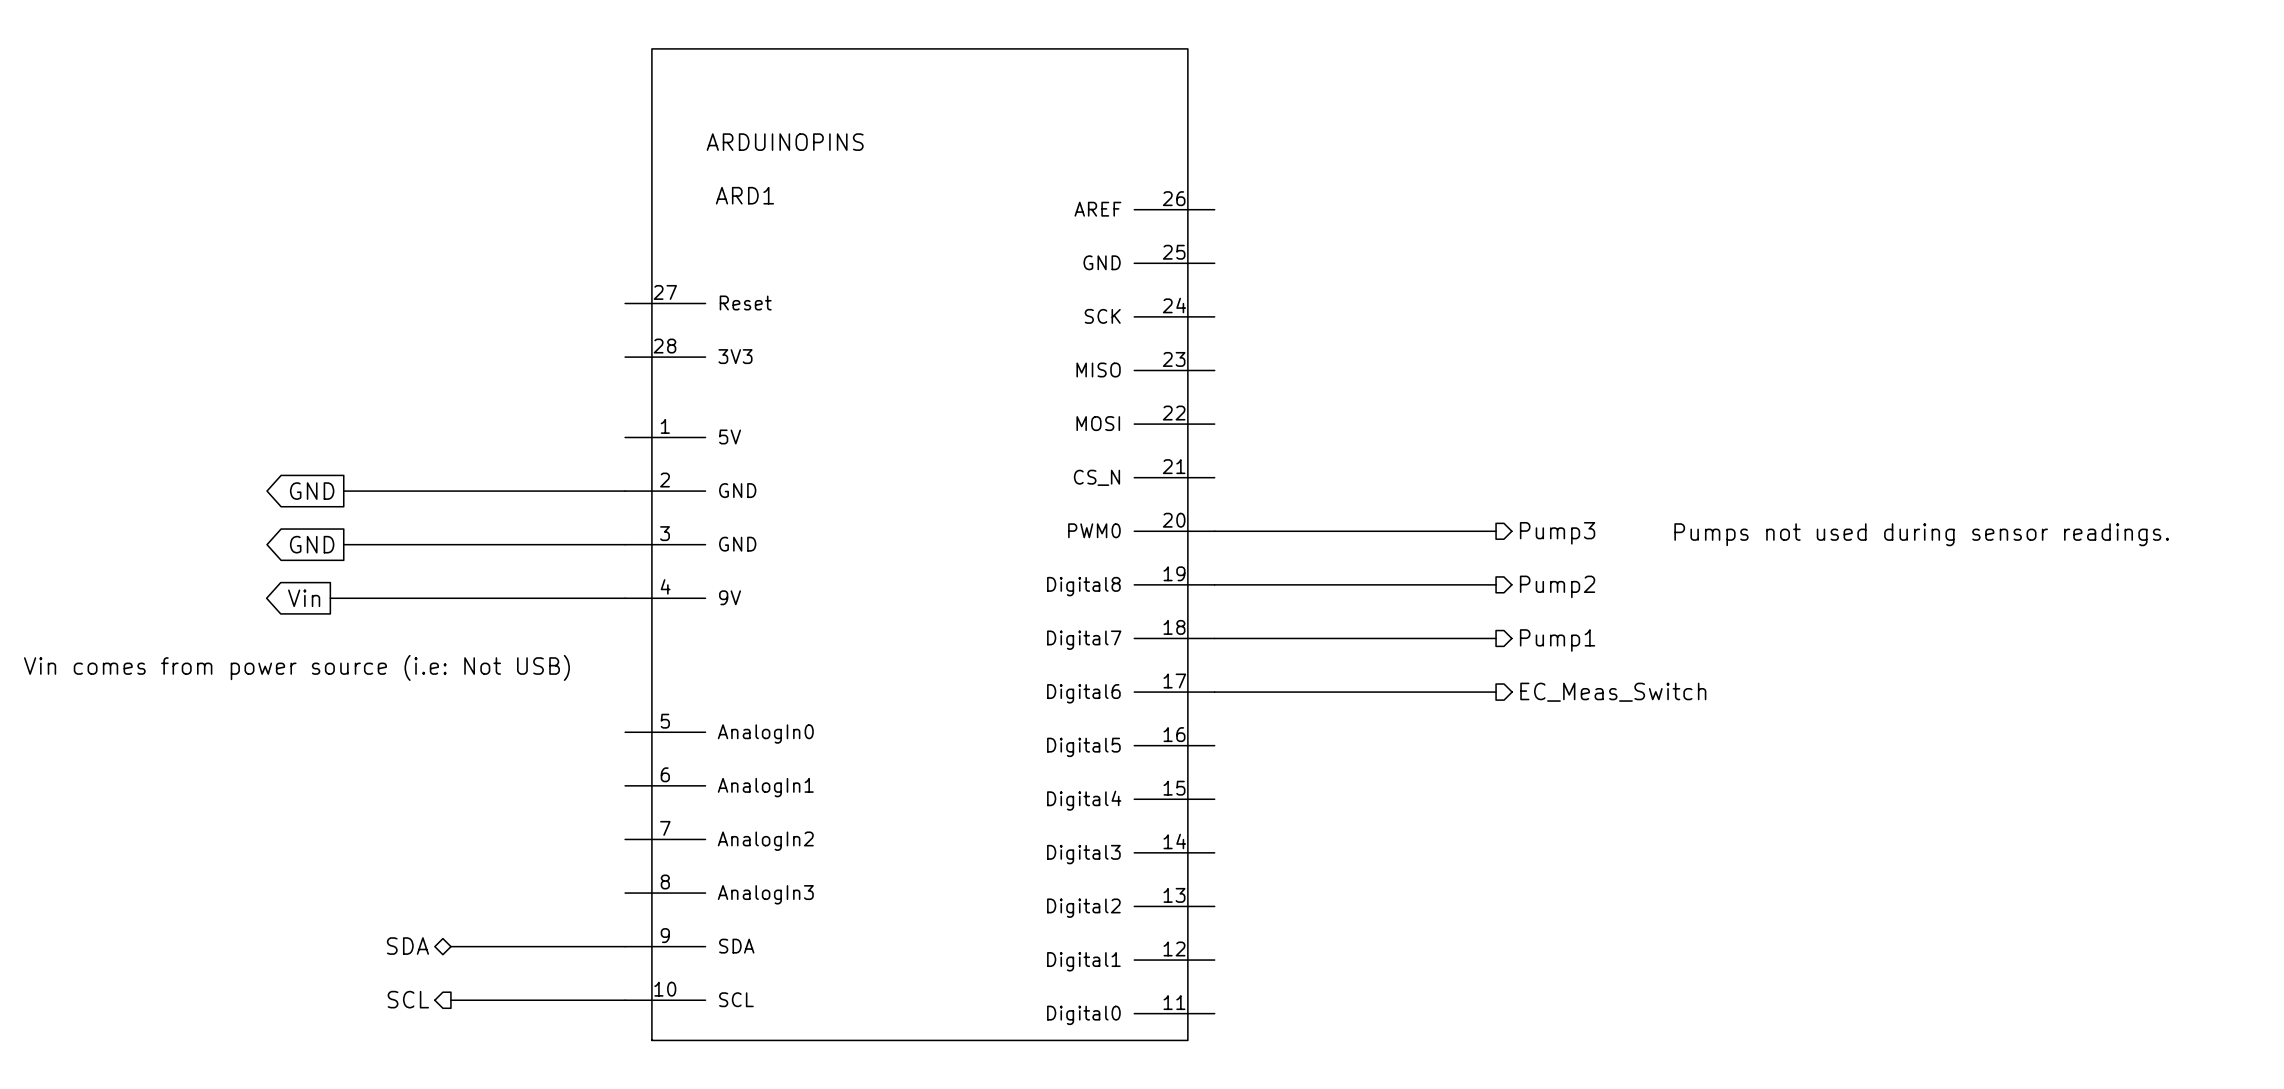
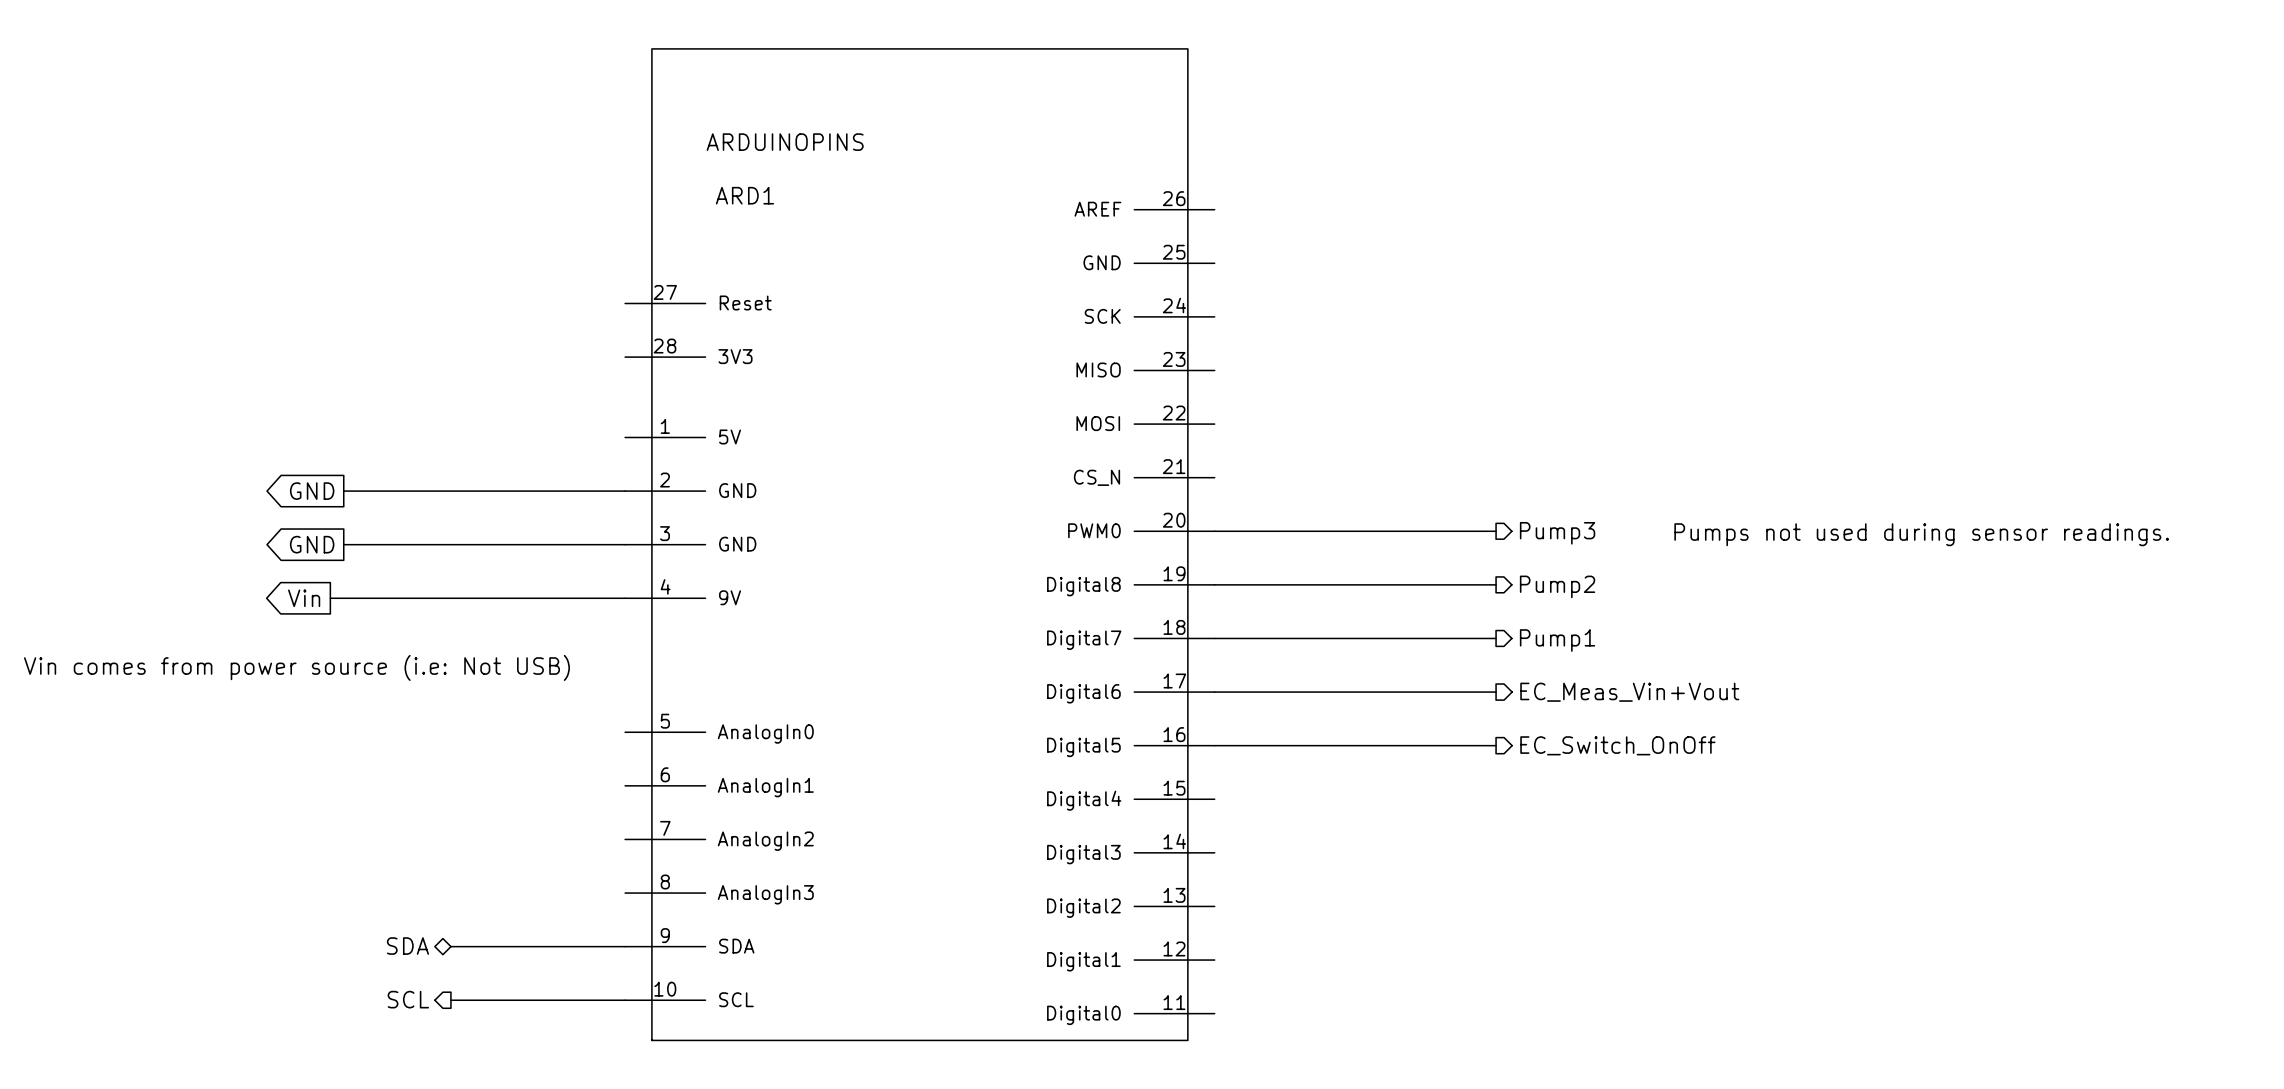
hierarchical label: EC_Meas_Switch (1613, 692) -> EC_Meas_Vin+Vout (1629, 692)
wire: none -> (1214, 745) (1496, 745)
hierarchical label: none -> EC_Switch_OnOff (1617, 745)

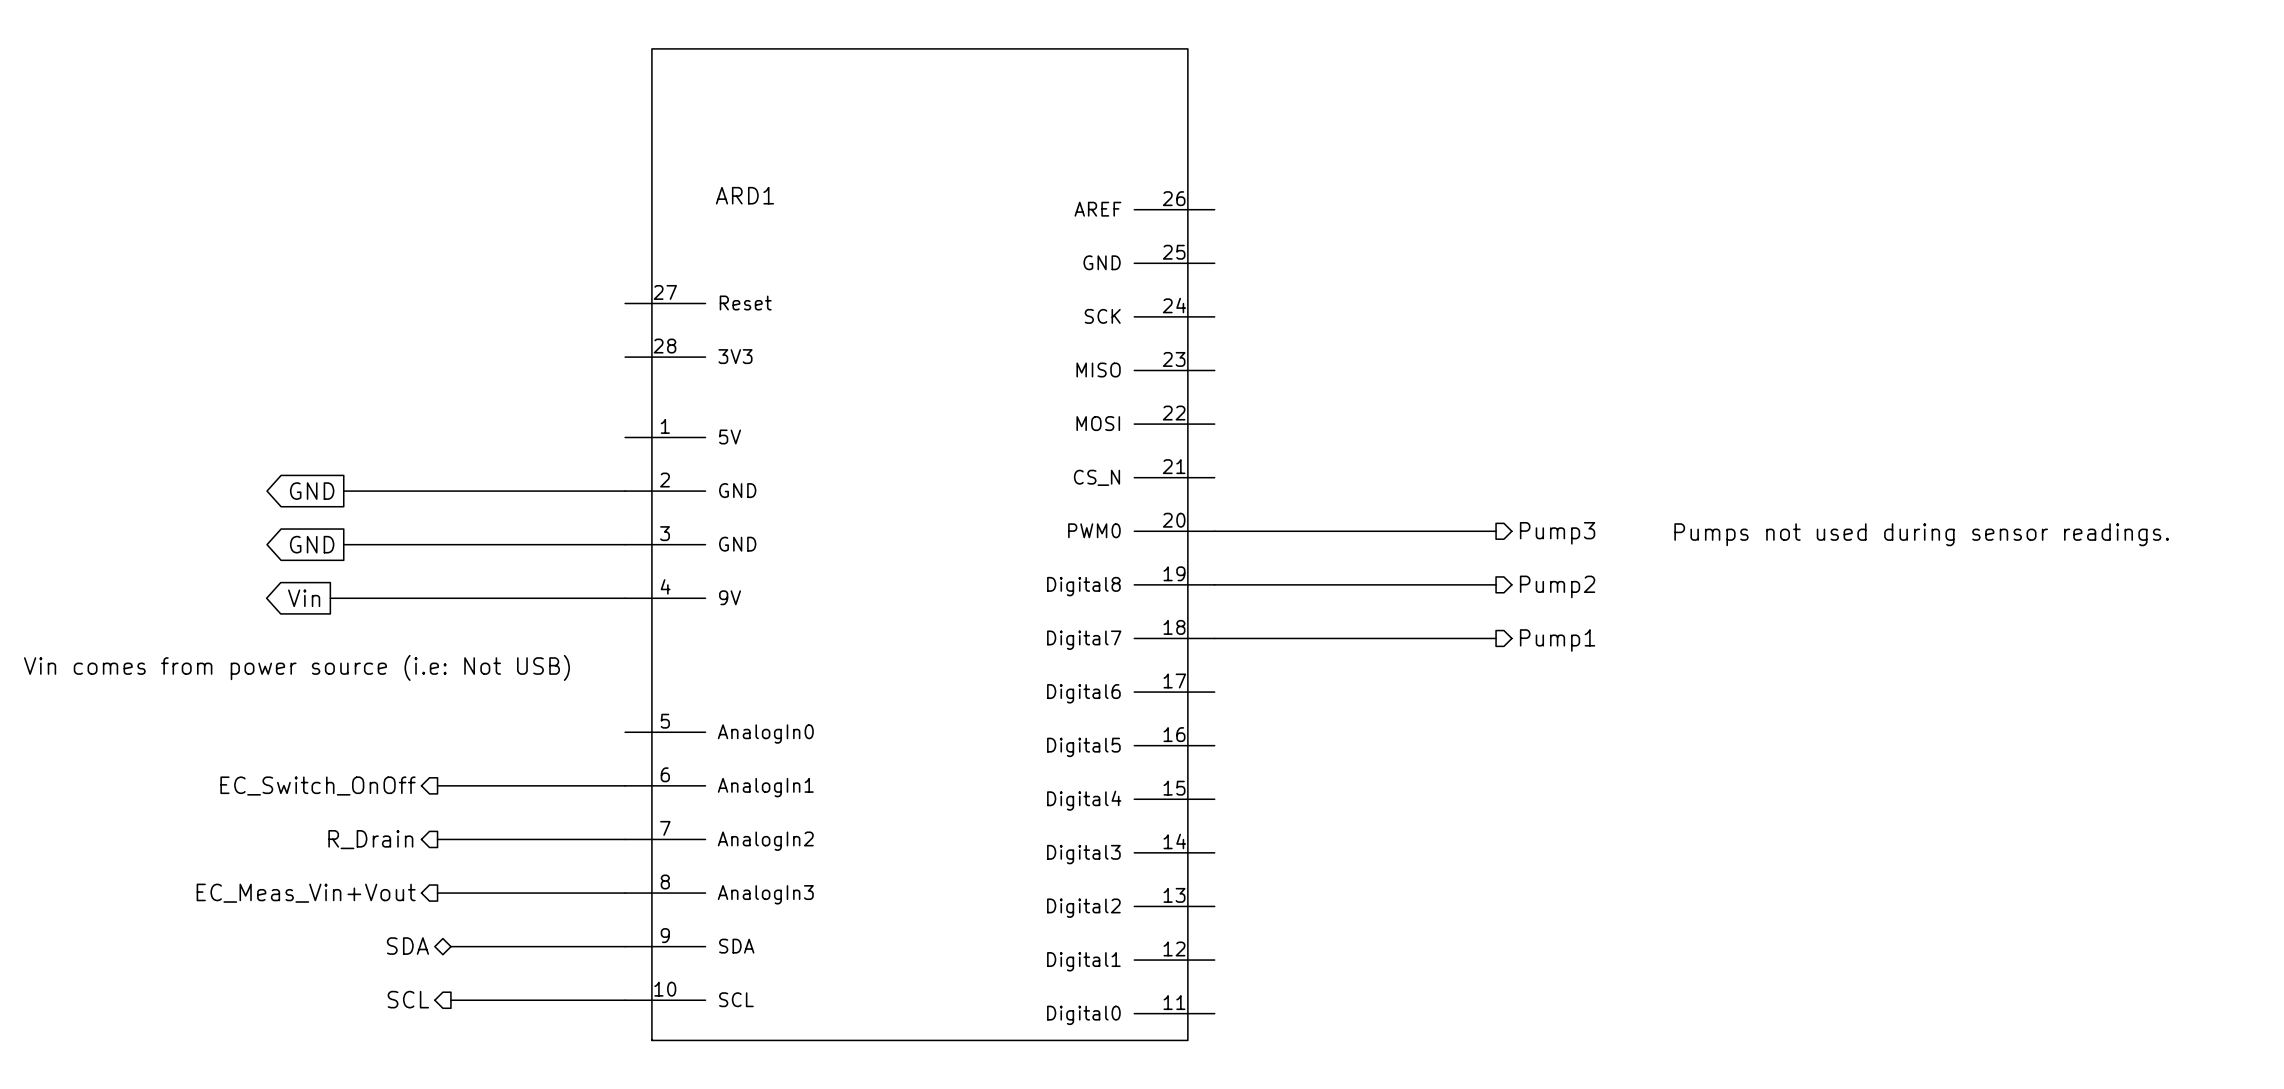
ARD1 value: ARDUINOPINS (785, 142) -> none
wire: (1214, 692) (1496, 692) -> none
hierarchical label: EC_Meas_Vin+Vout (1629, 692) -> none
wire: (1214, 745) (1496, 745) -> none
hierarchical label: EC_Switch_OnOff (1617, 745) -> none
wire: none -> (437, 785) (625, 785)
hierarchical label: none -> EC_Switch_OnOff (318, 786)
hierarchical label: none -> R_Drain (370, 839)
wire: none -> (437, 839) (625, 839)
hierarchical label: none -> EC_Meas_Vin+Vout (306, 893)
wire: none -> (437, 893) (625, 893)

